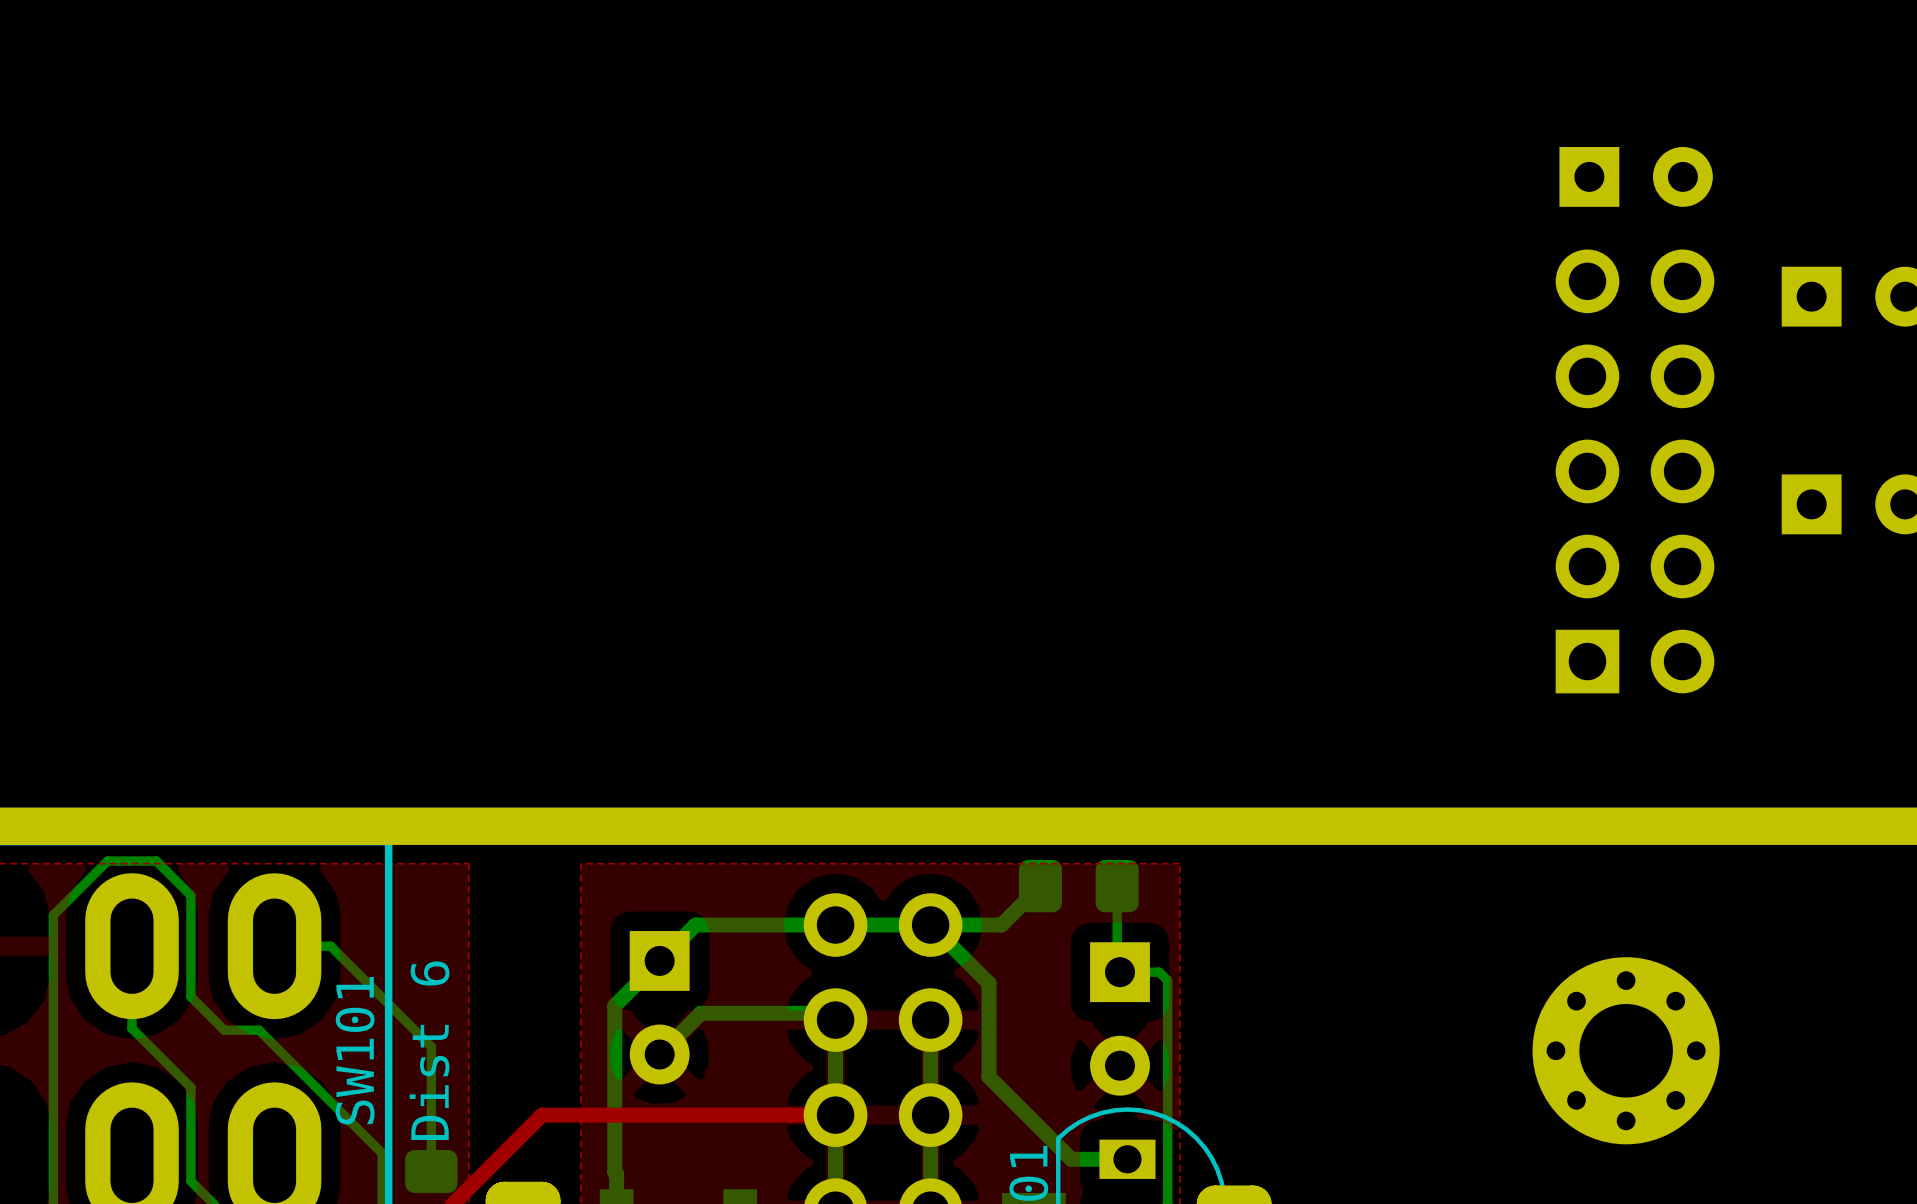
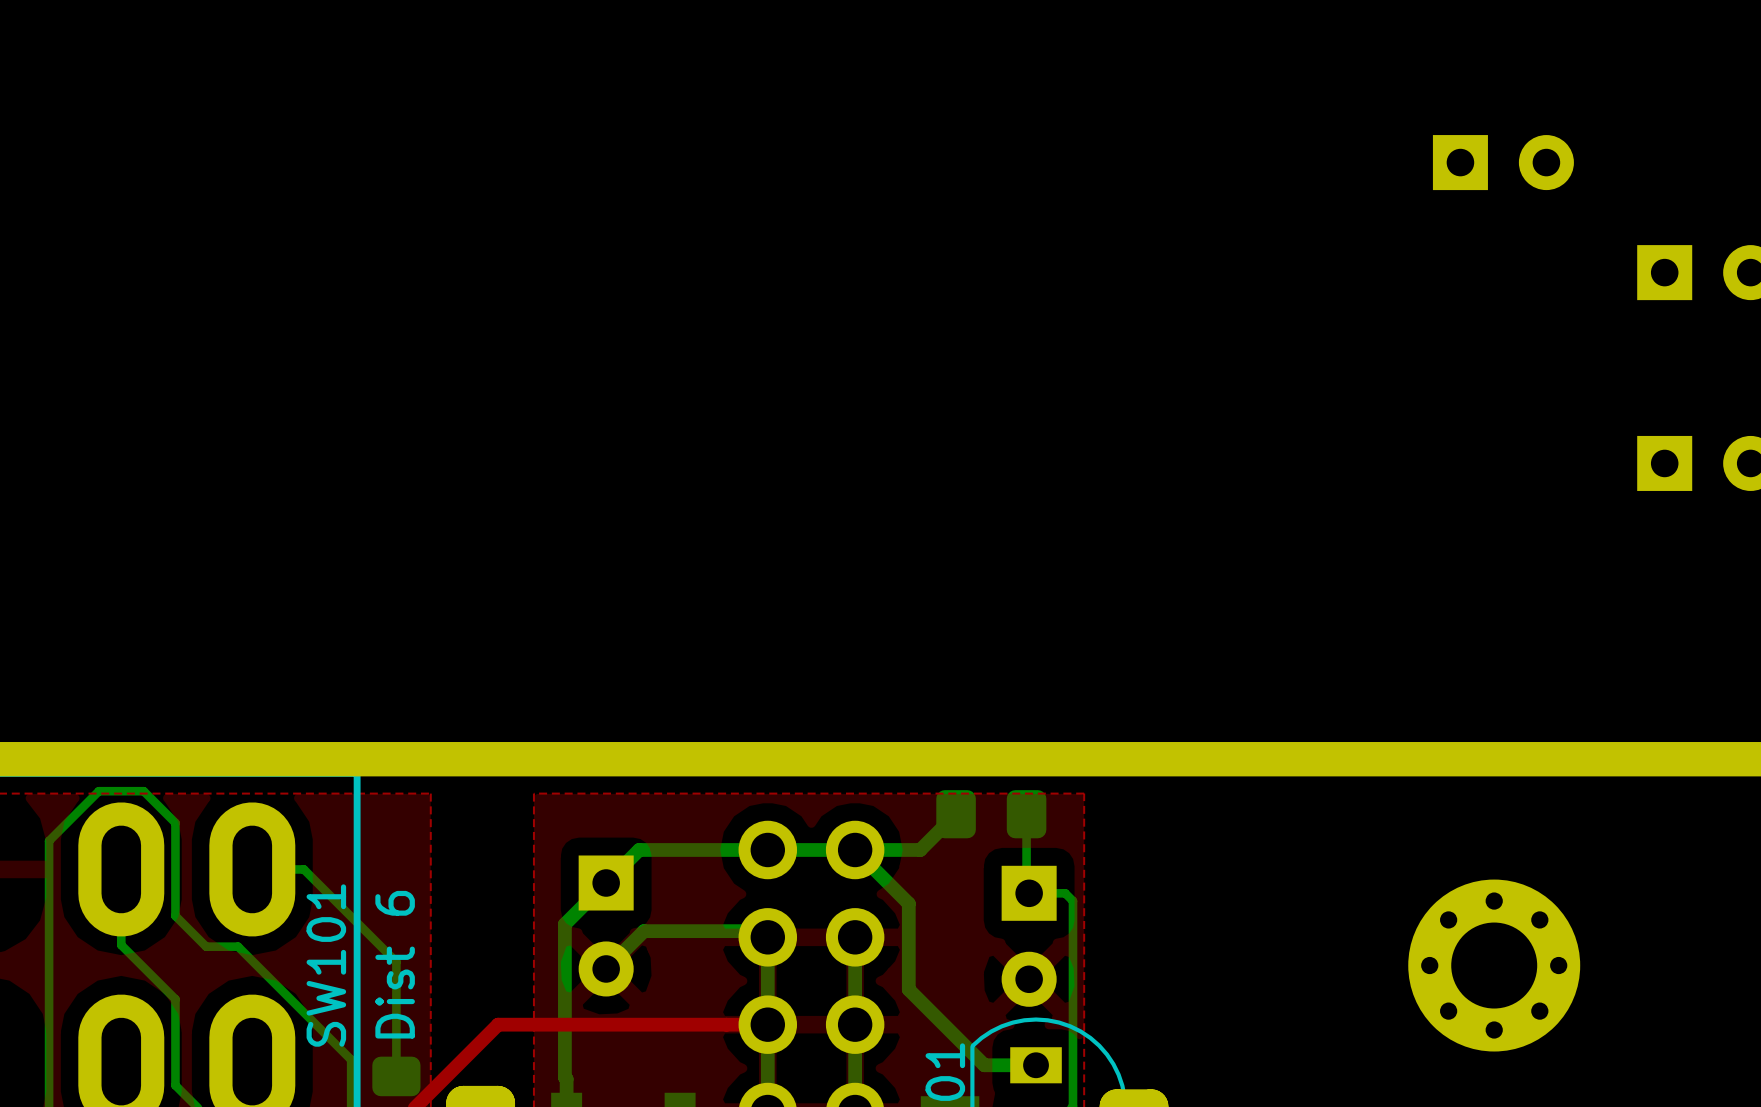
part: (1635, 471) -> none

